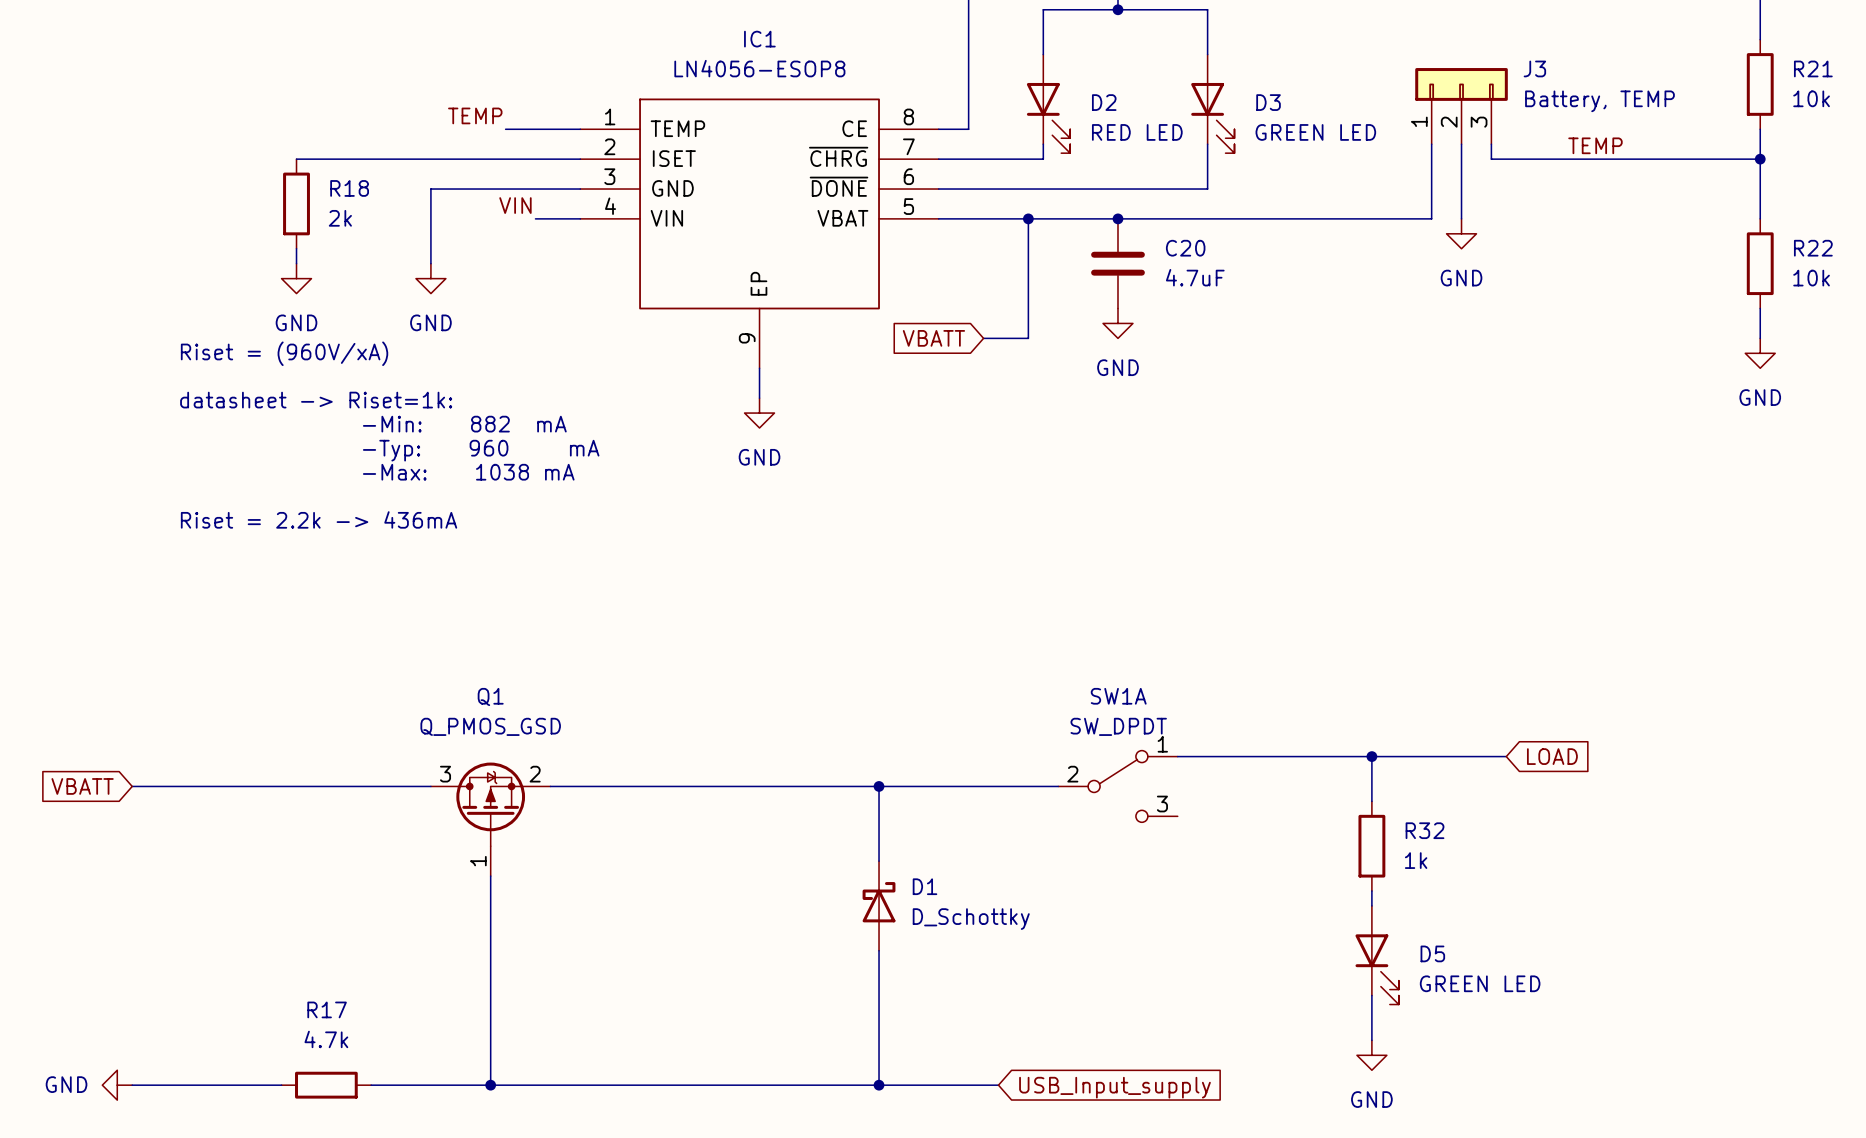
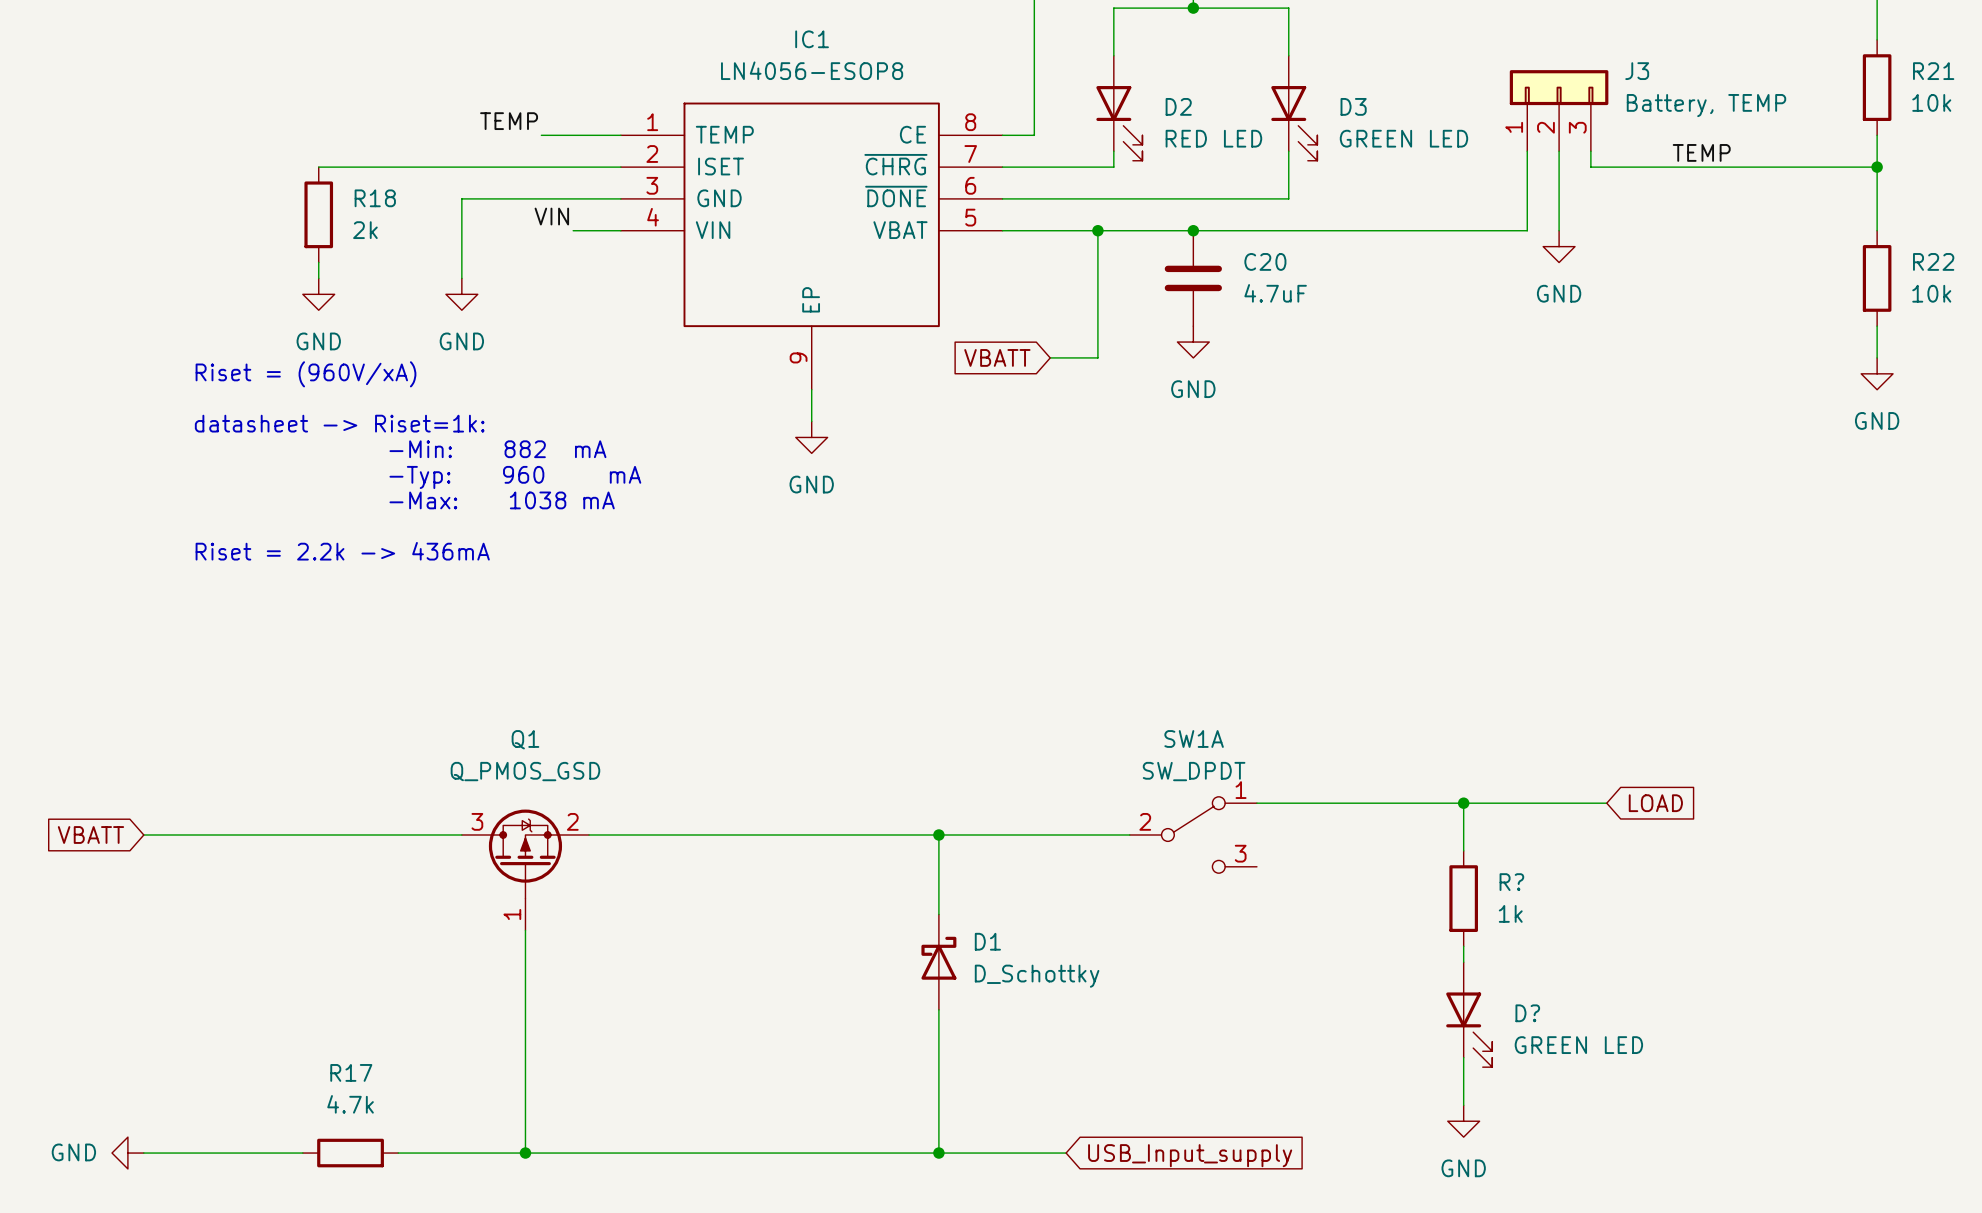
R32 name: R32 (1425, 830) -> R? (1511, 882)
D5 name: D5 (1432, 953) -> D? (1527, 1013)

